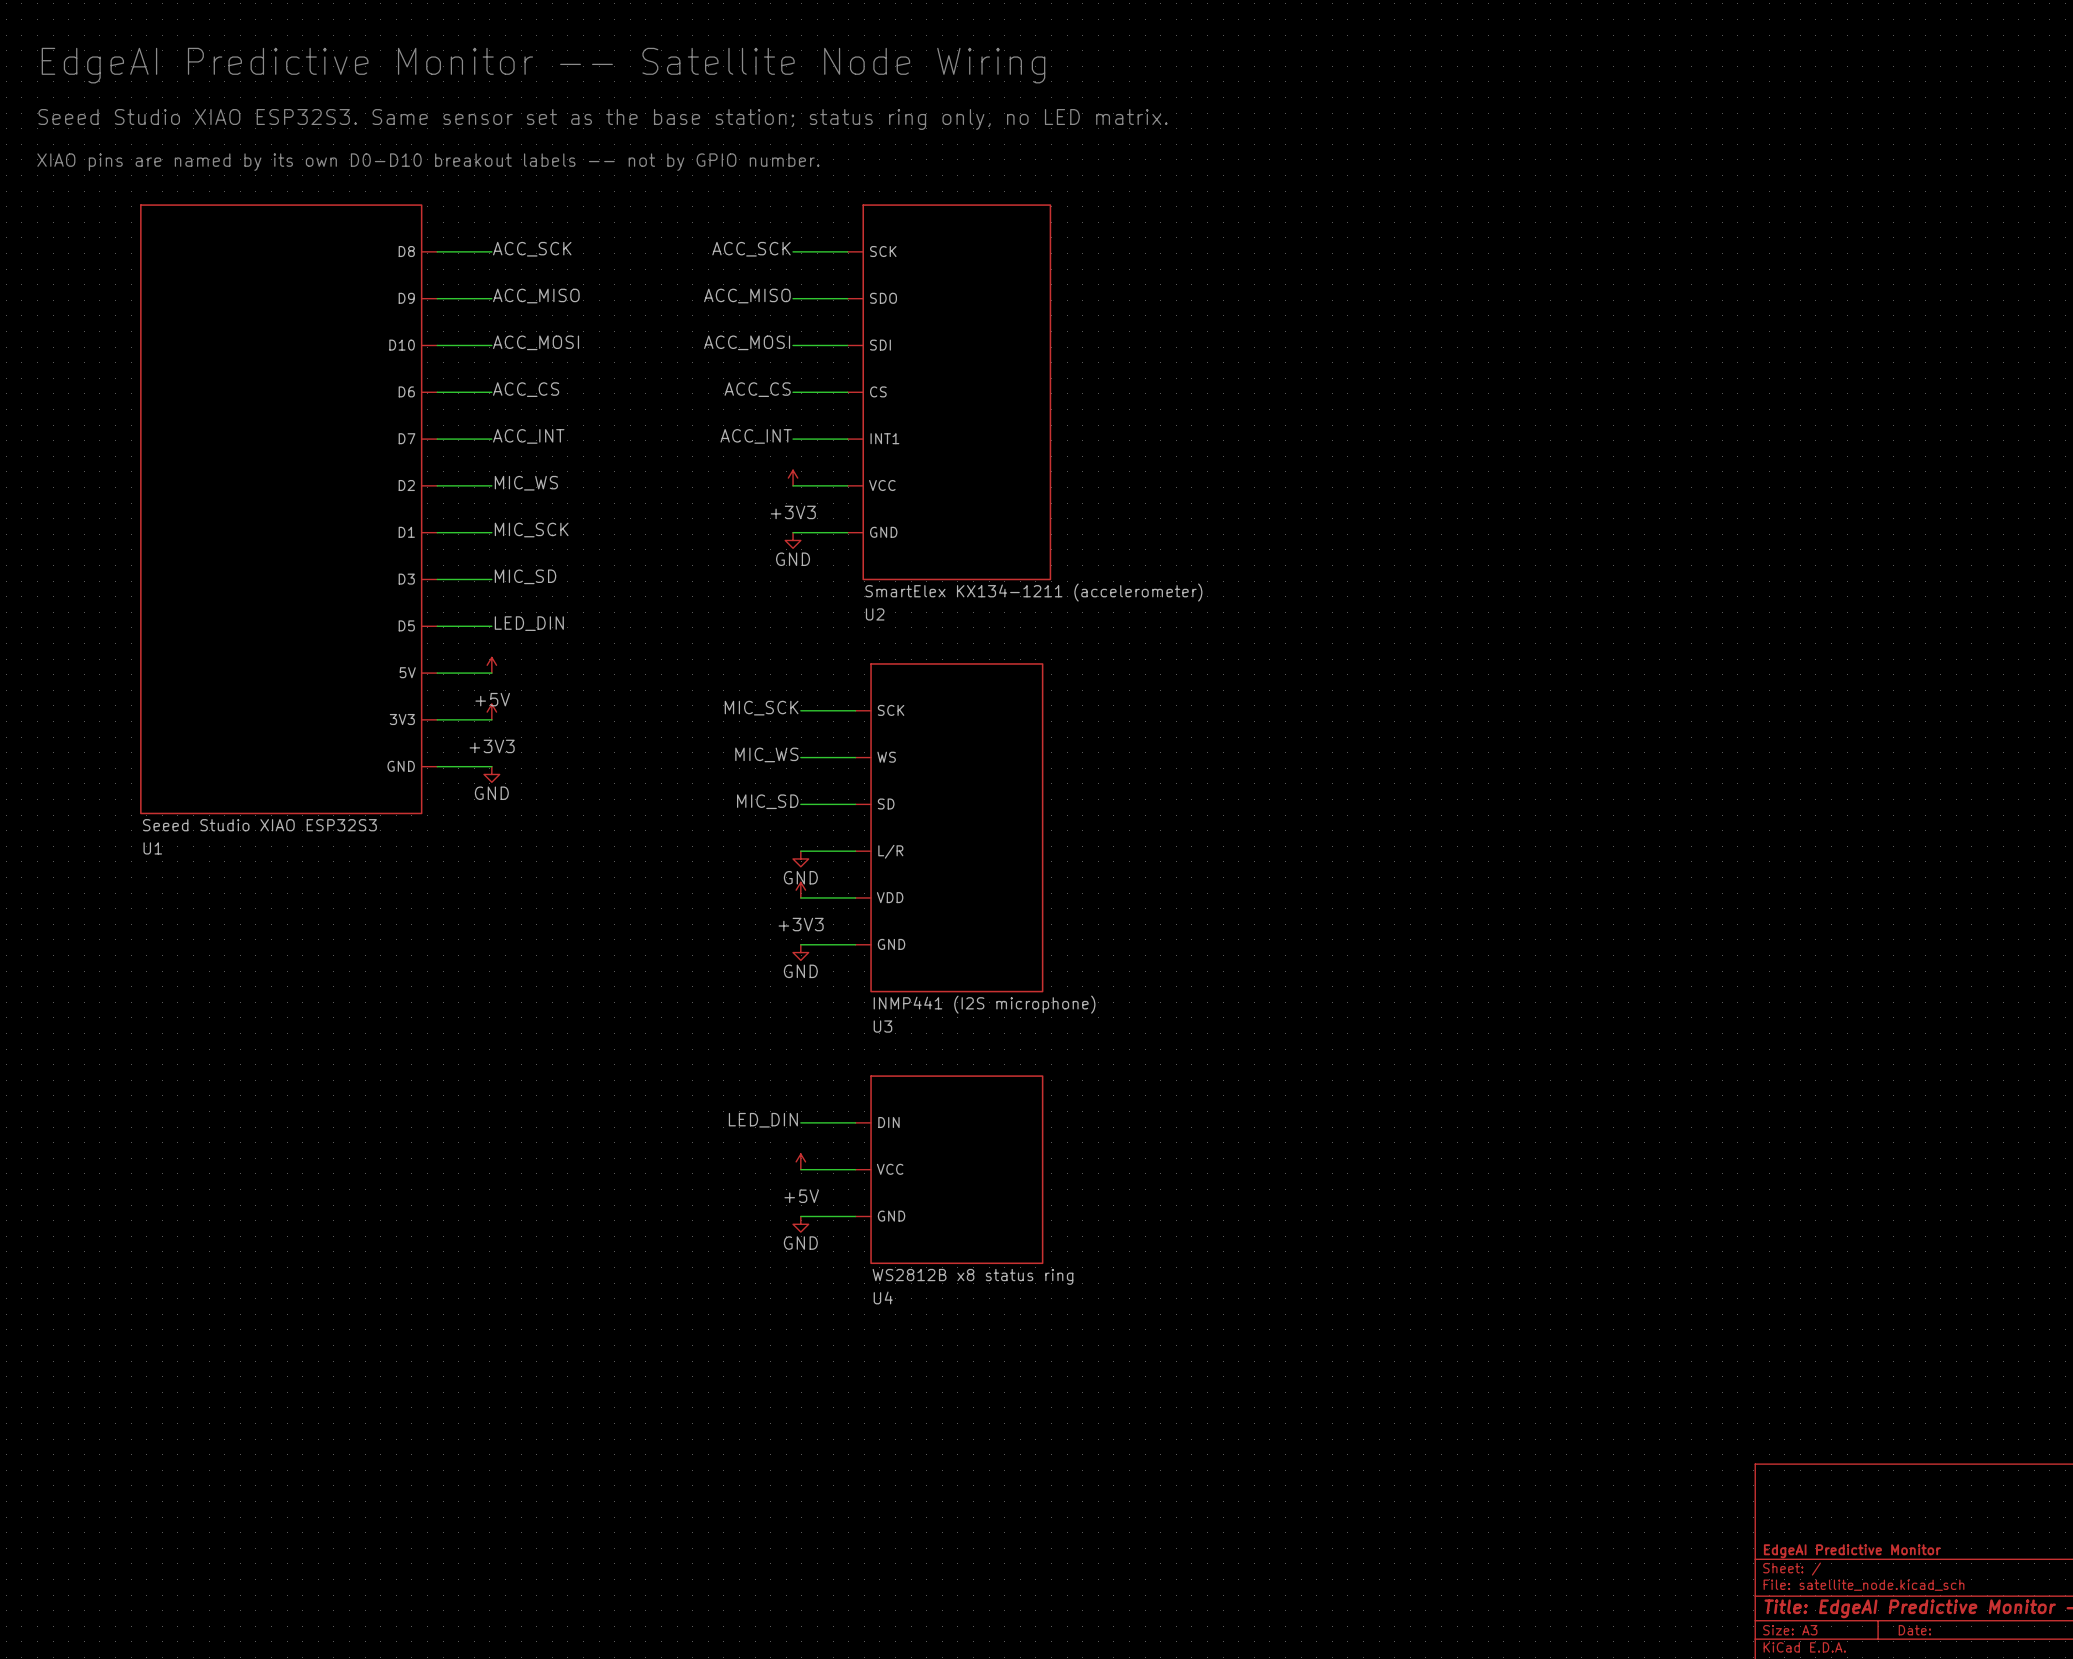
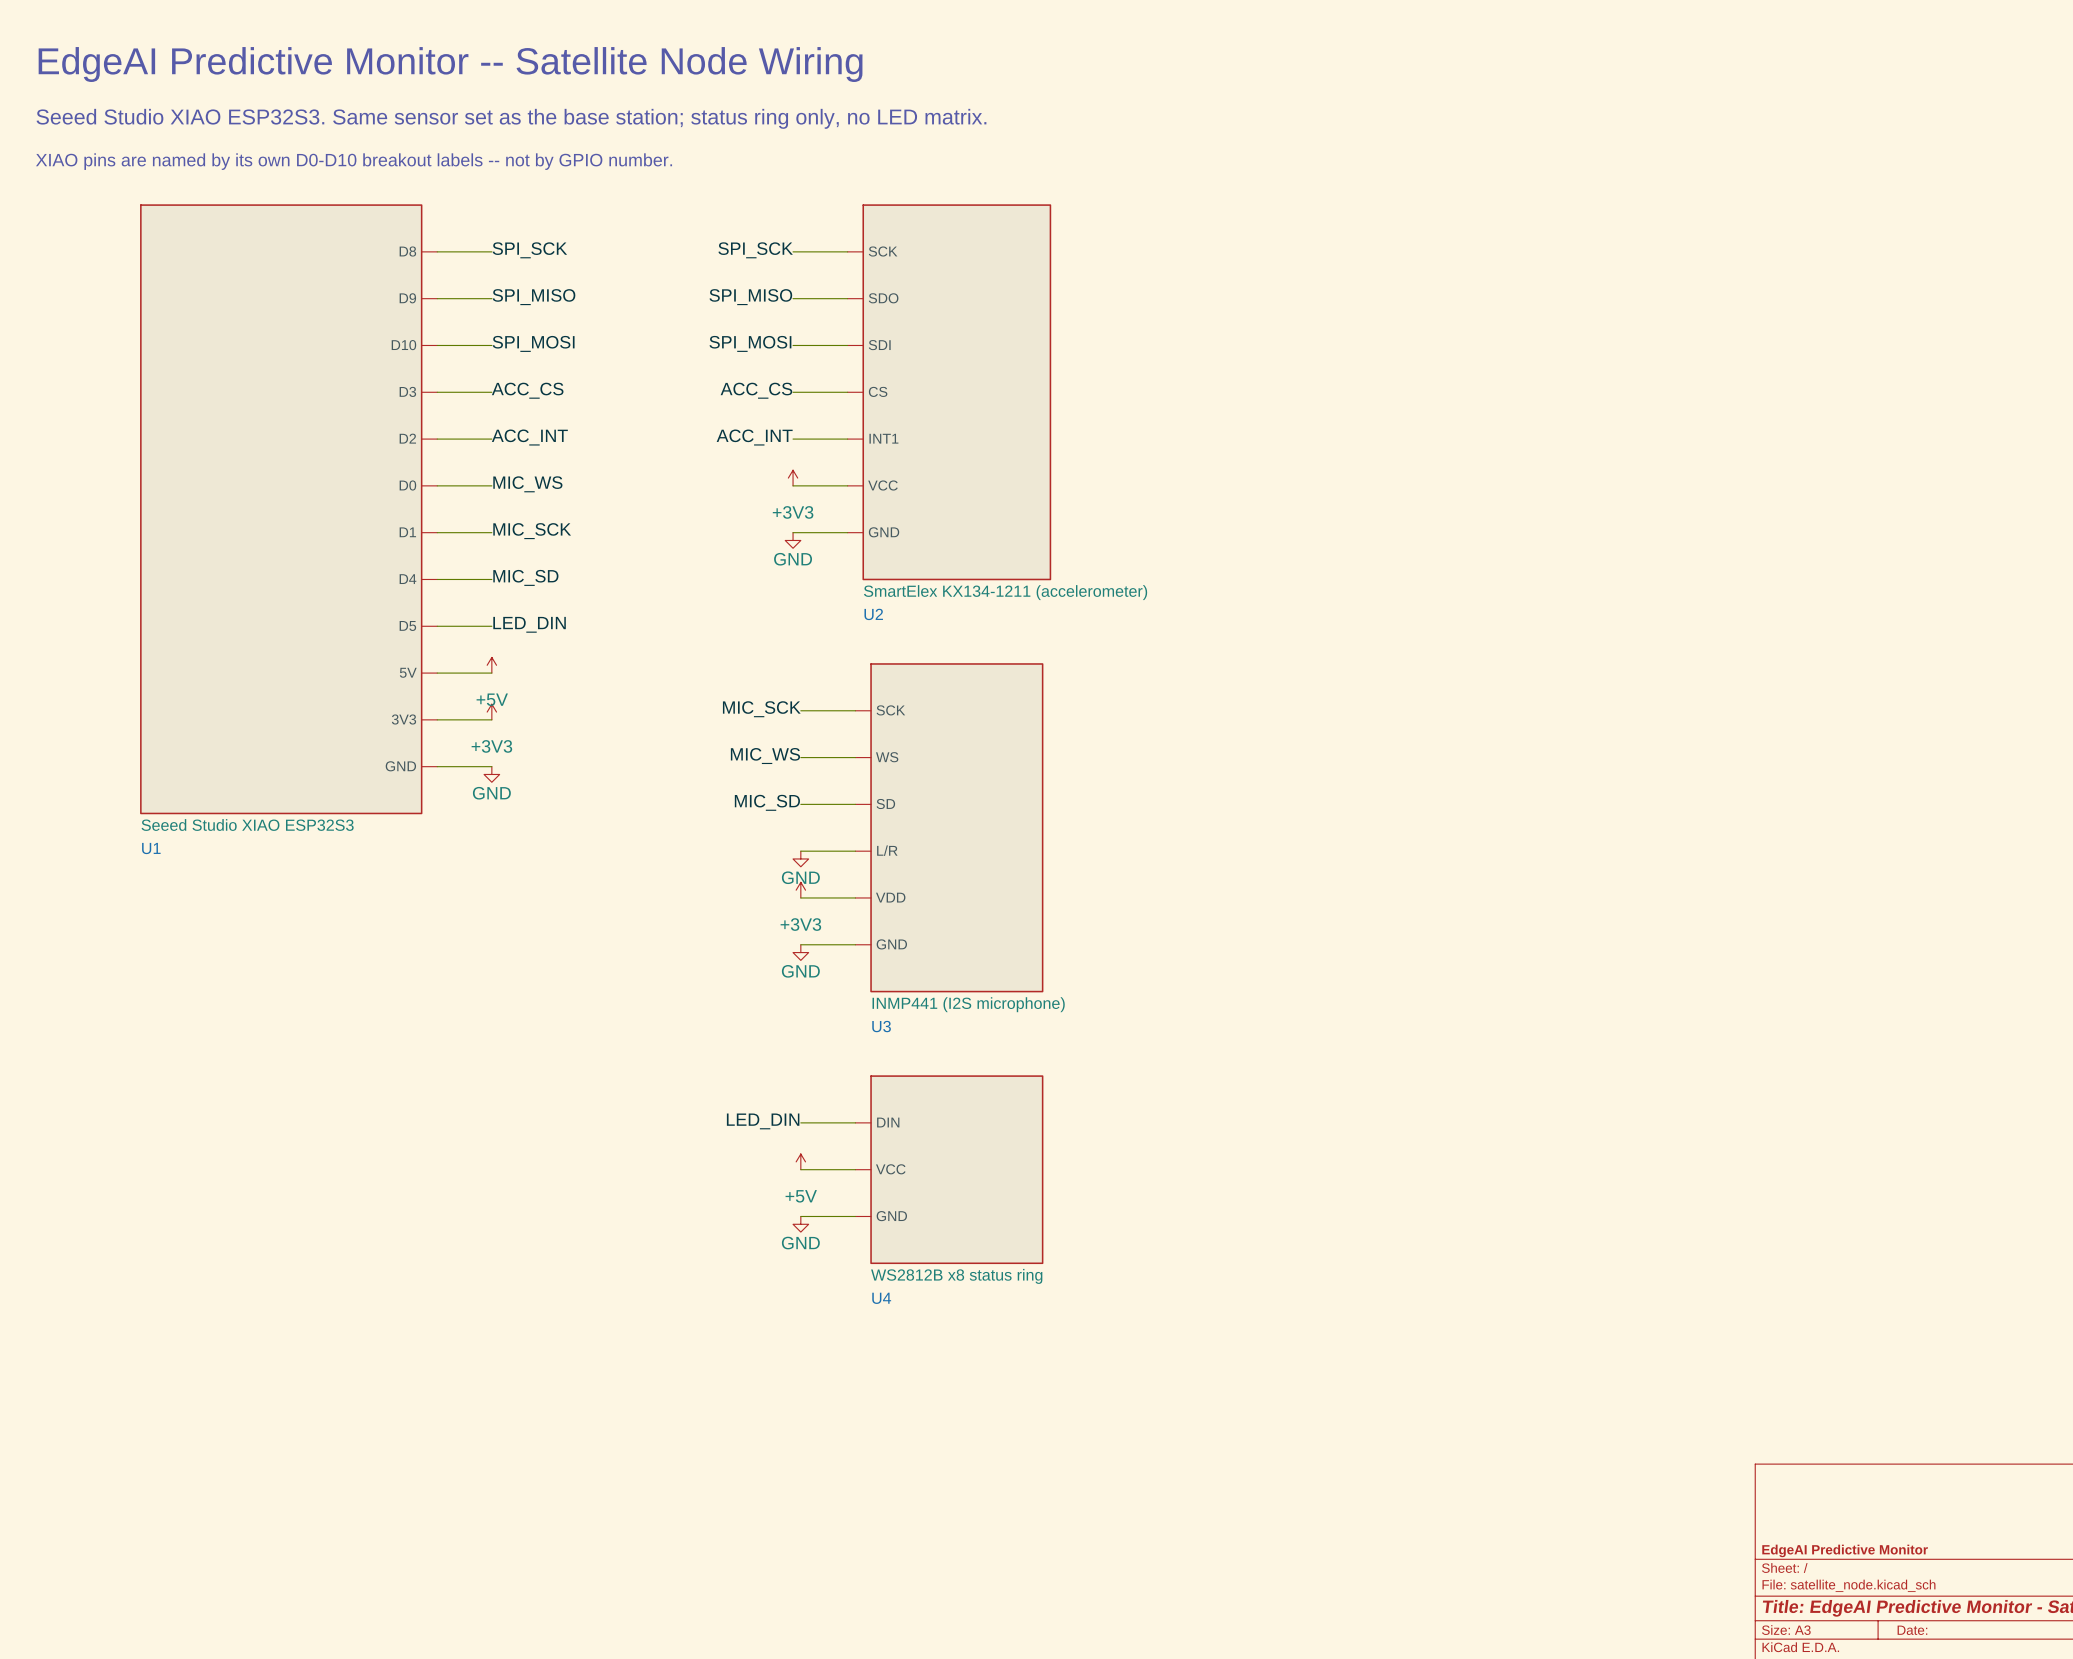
label: ACC_SCK (532, 249) -> SPI_SCK (529, 250)
label: ACC_SCK (751, 249) -> SPI_SCK (755, 250)
label: ACC_MISO (536, 296) -> SPI_MISO (534, 297)
label: ACC_MISO (747, 296) -> SPI_MISO (750, 297)
label: ACC_MOSI (536, 342) -> SPI_MOSI (533, 343)
label: ACC_MOSI (747, 342) -> SPI_MOSI (750, 343)
U1 pin name: D6 (406, 391) -> D3 (407, 391)
U1 pin name: D7 (406, 438) -> D2 (407, 438)
U1 pin name: D2 (406, 485) -> D0 (407, 485)
U1 pin name: D3 (406, 579) -> D4 (407, 579)

